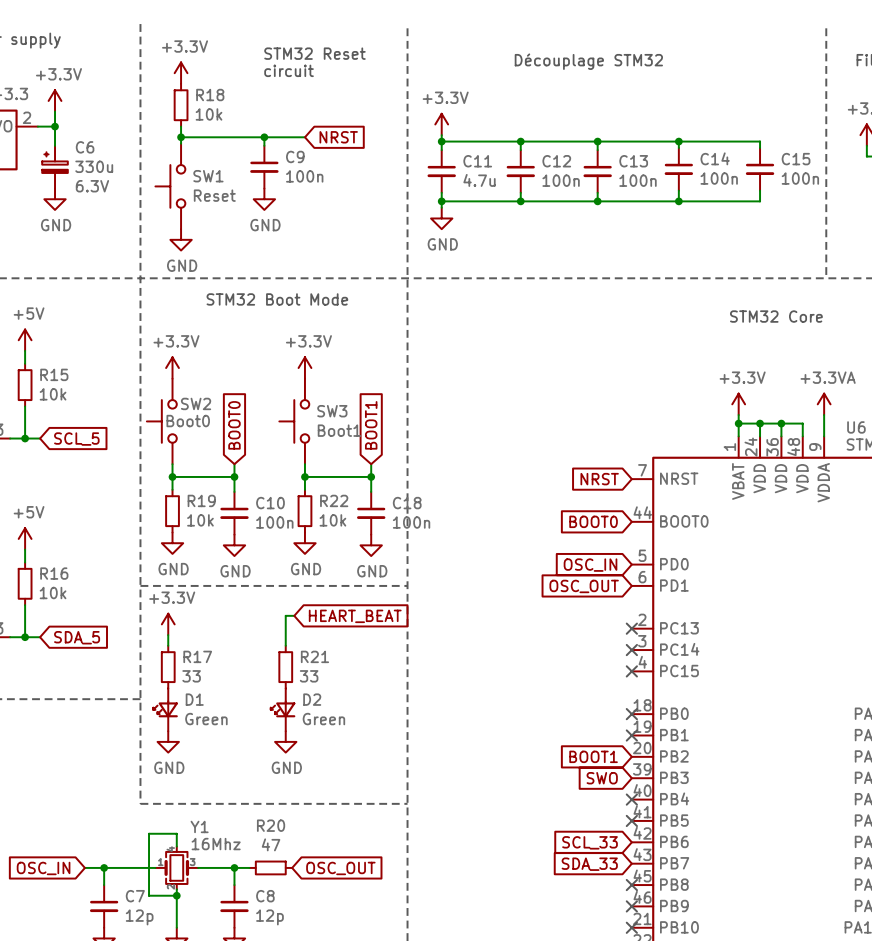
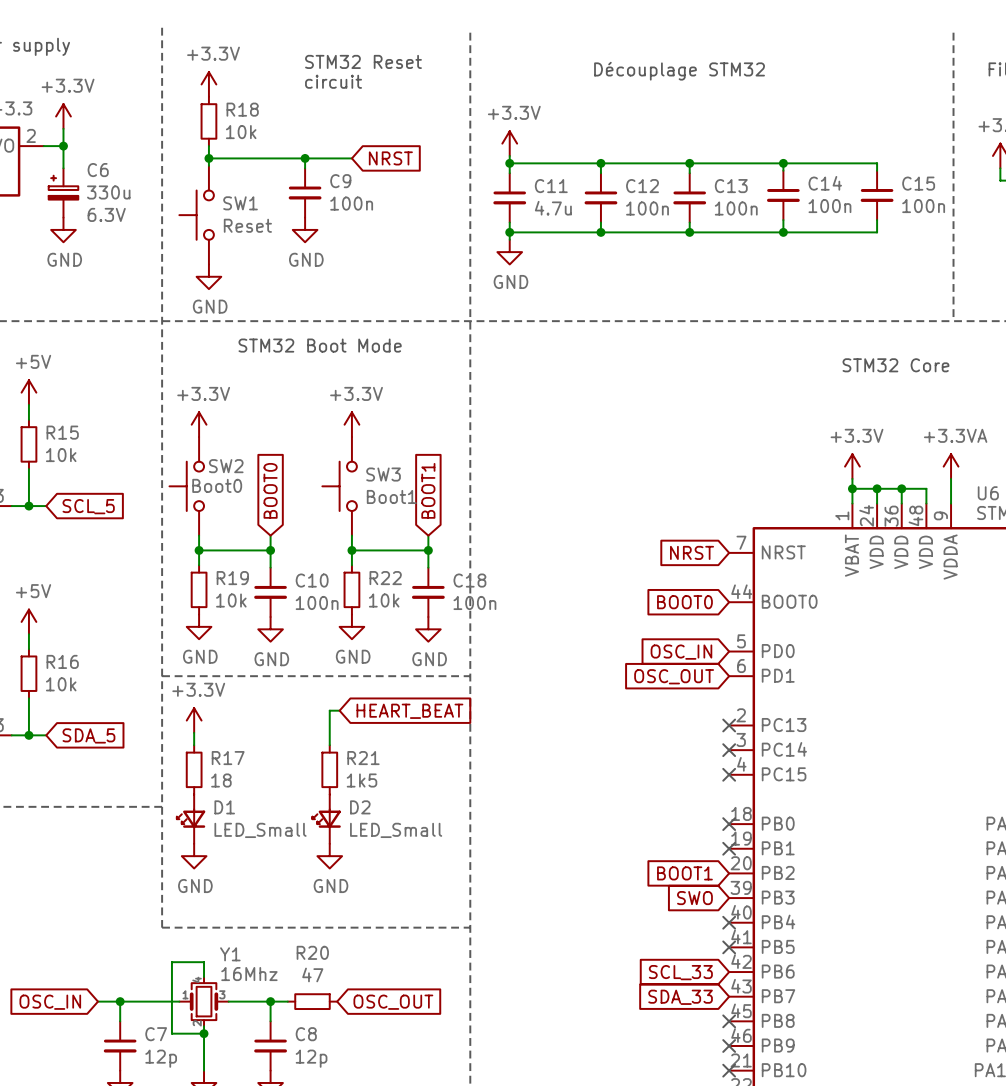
R17 value: 33 (191, 676) -> 18 (221, 780)
R21 value: 33 (309, 676) -> 1k5 (362, 780)
D1 value: Green (206, 719) -> LED_Small (260, 830)
D2 value: Green (323, 719) -> LED_Small (396, 830)

